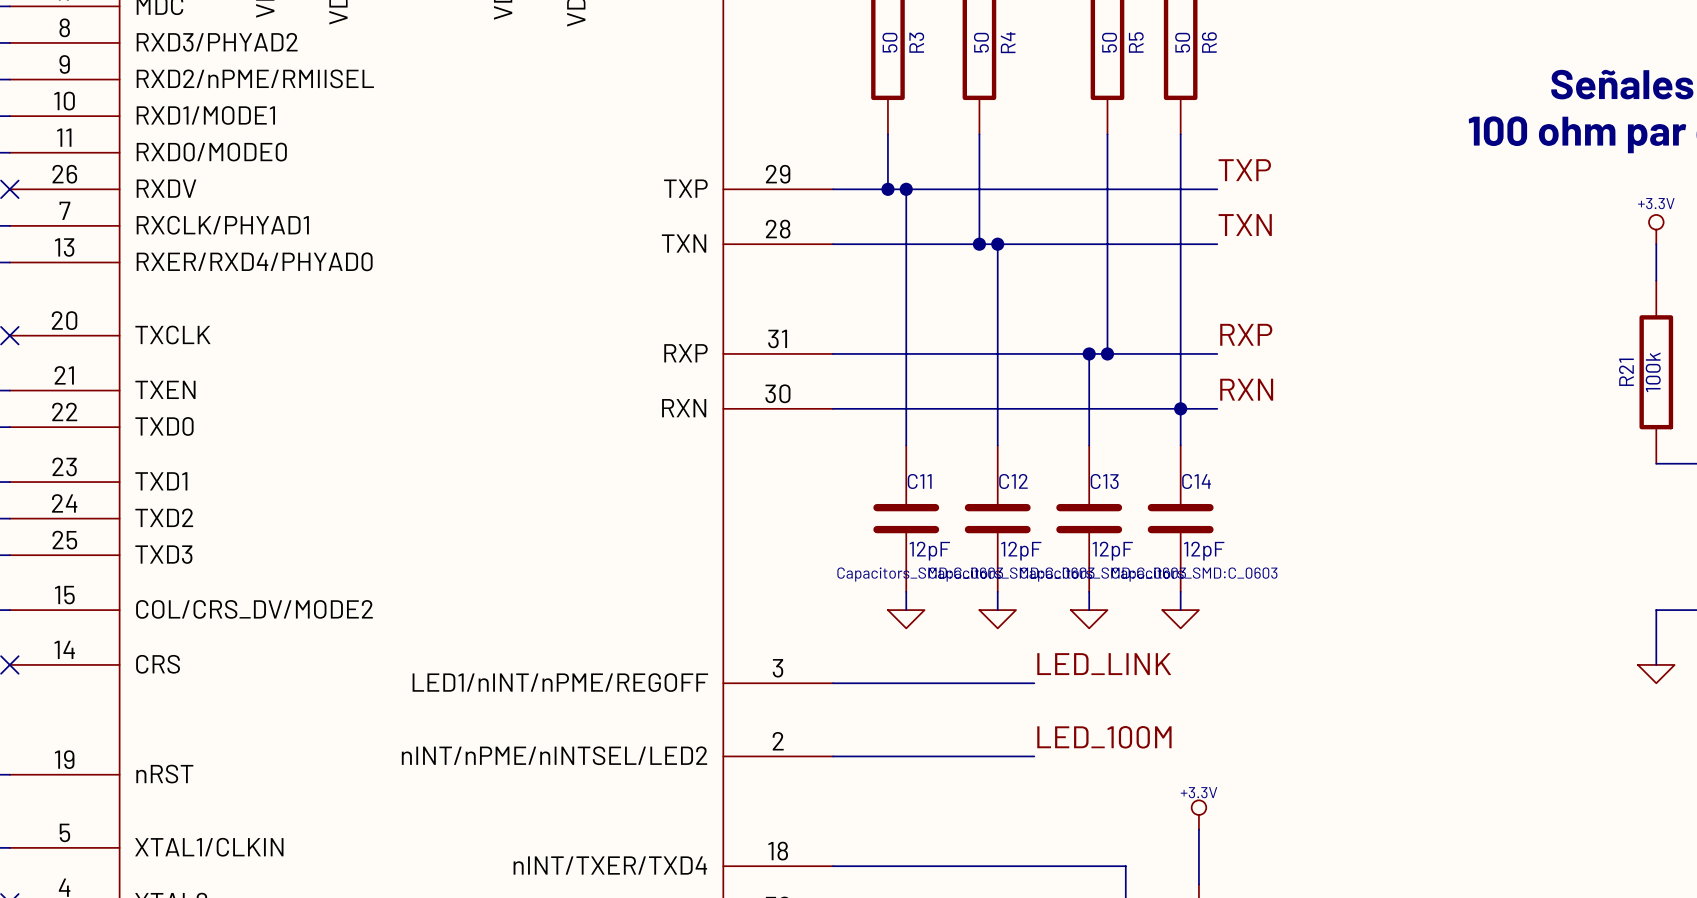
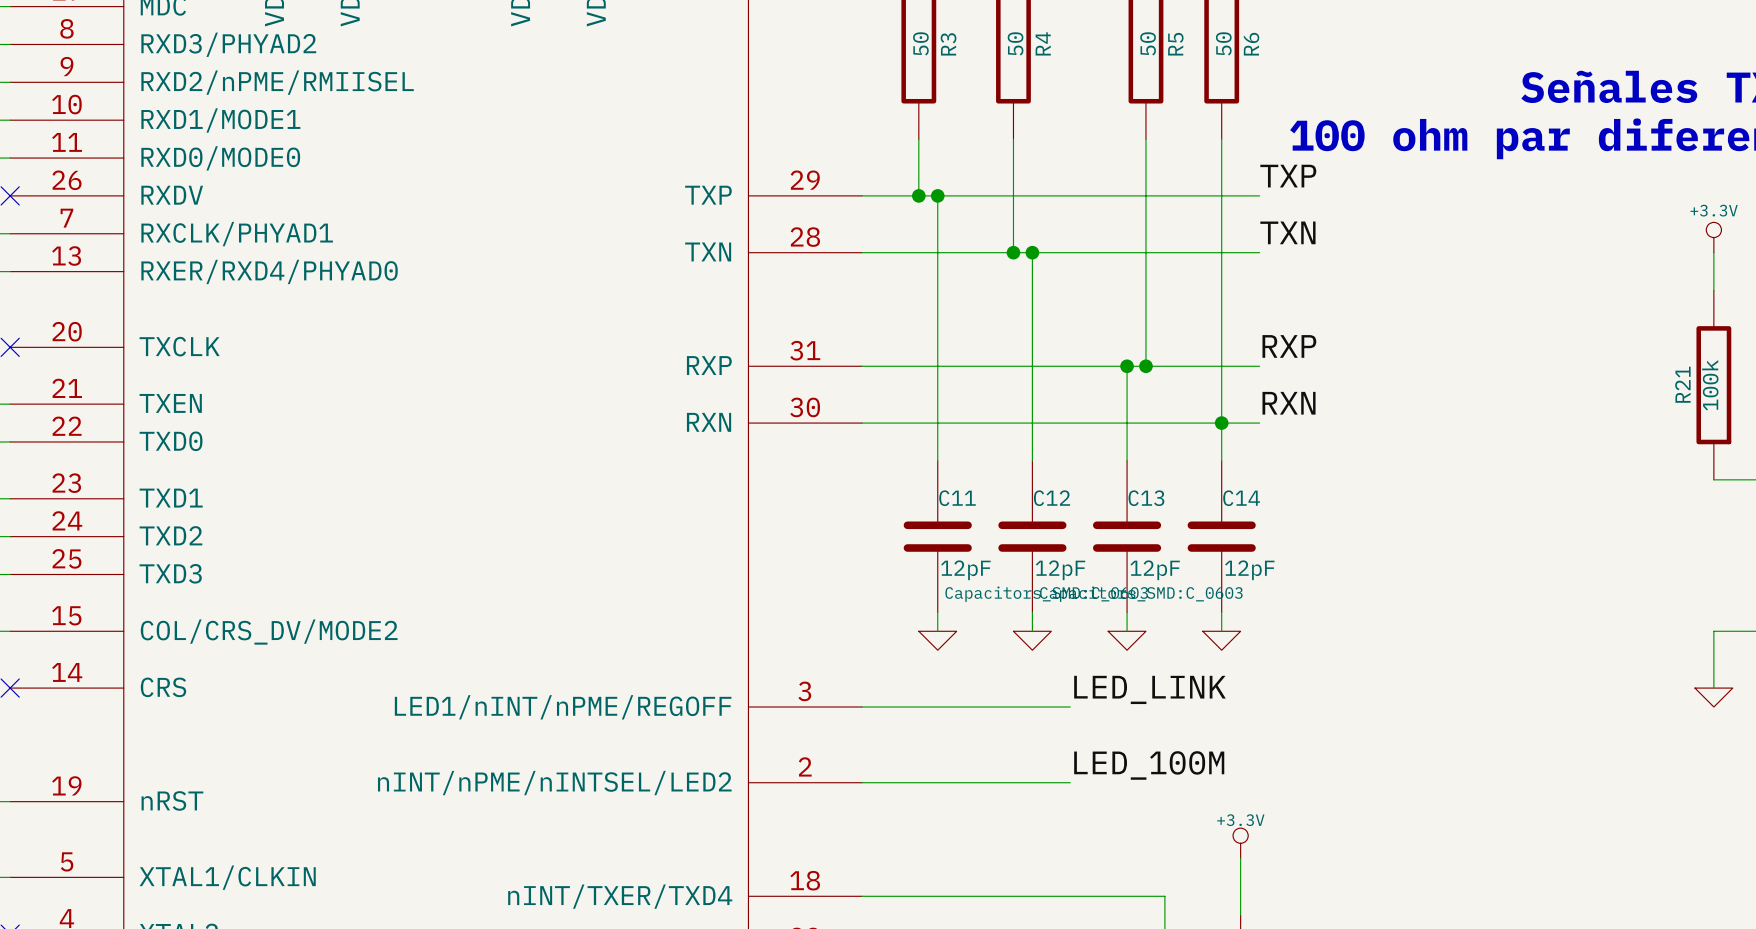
C11 text: Capacitors_SMD:C_0603 (920, 574) -> none
C14 text: Capacitors_SMD:C_0603 (1194, 574) -> none

